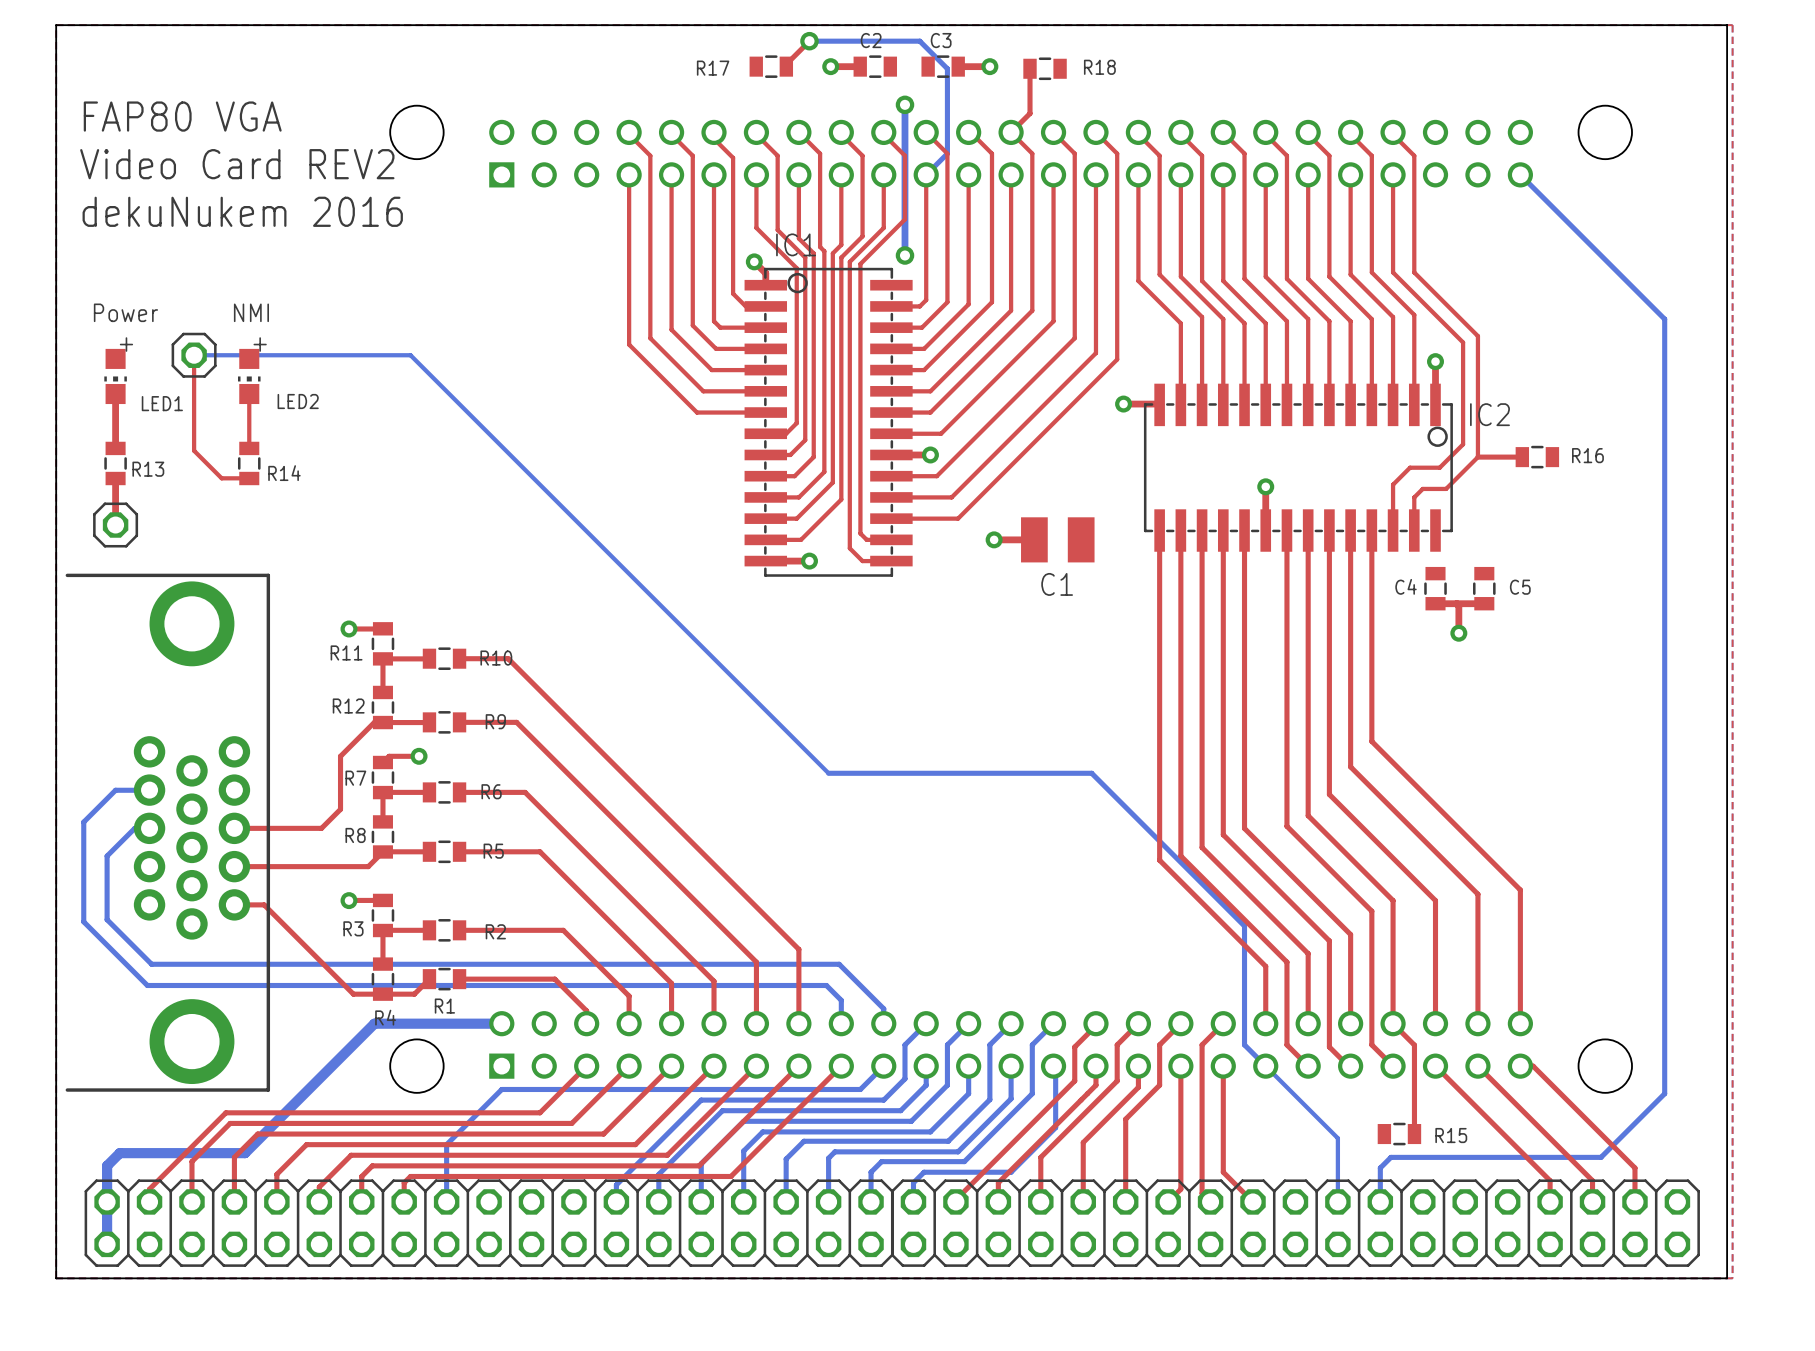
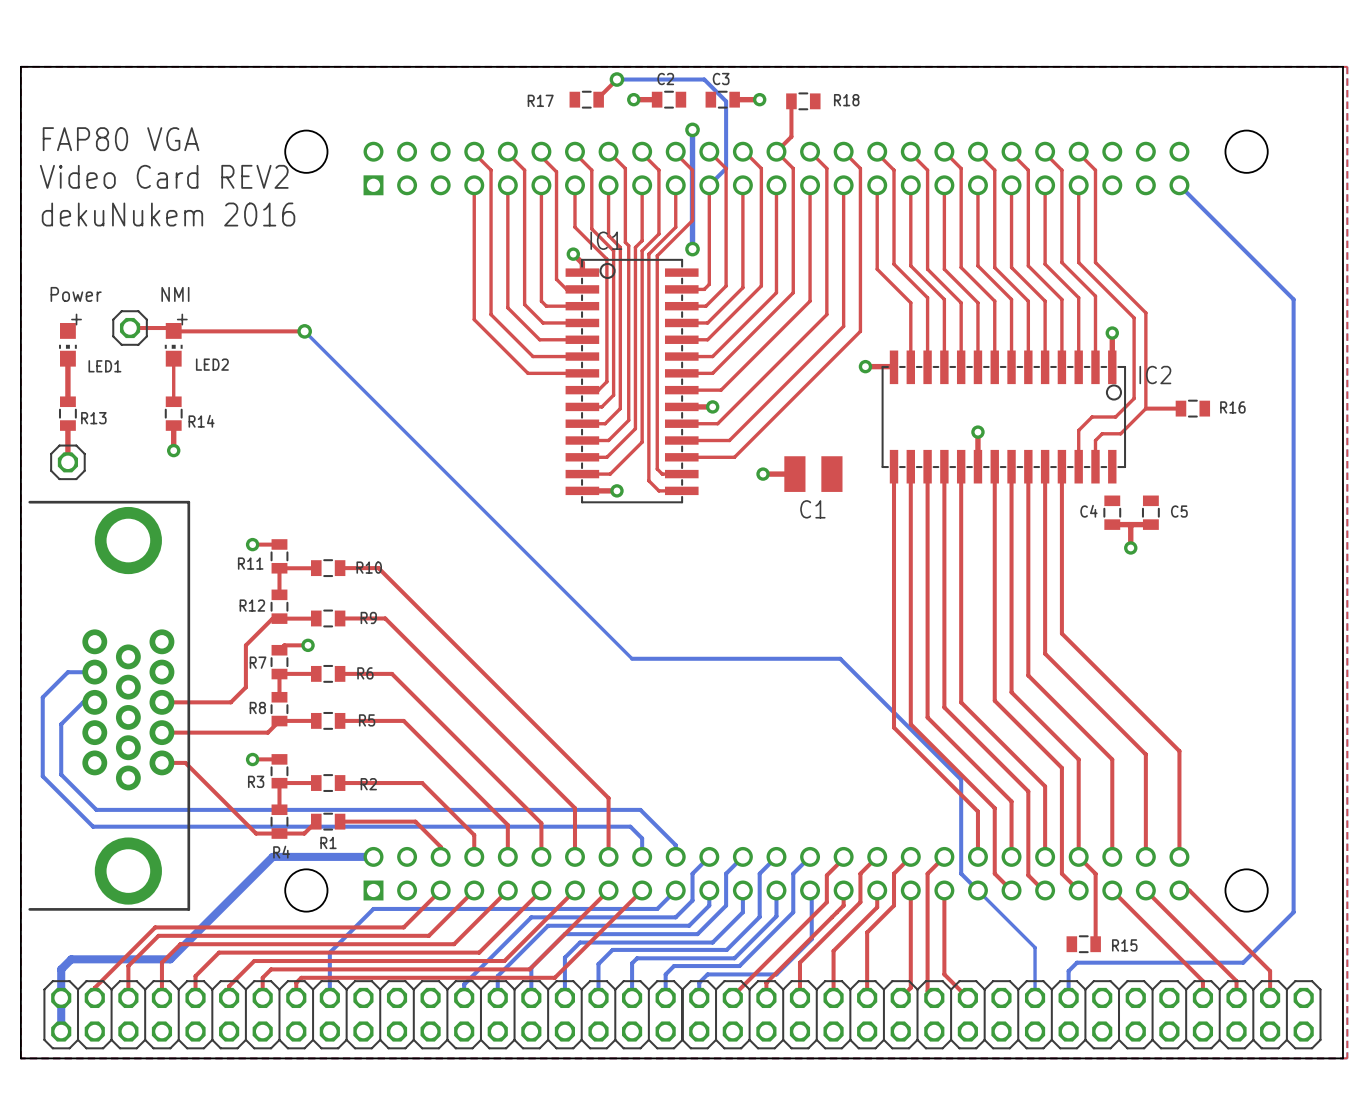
top track: (194, 355) (194, 450) (221, 478) (249, 478) -> (173, 450) (173, 425)
top track: none -> (130, 328) (170, 328) (174, 331) (304, 331)
bottom track: (194, 355) (410, 355) (414, 359) -> none
via: none -> (304, 331)
via: none -> (173, 450)

